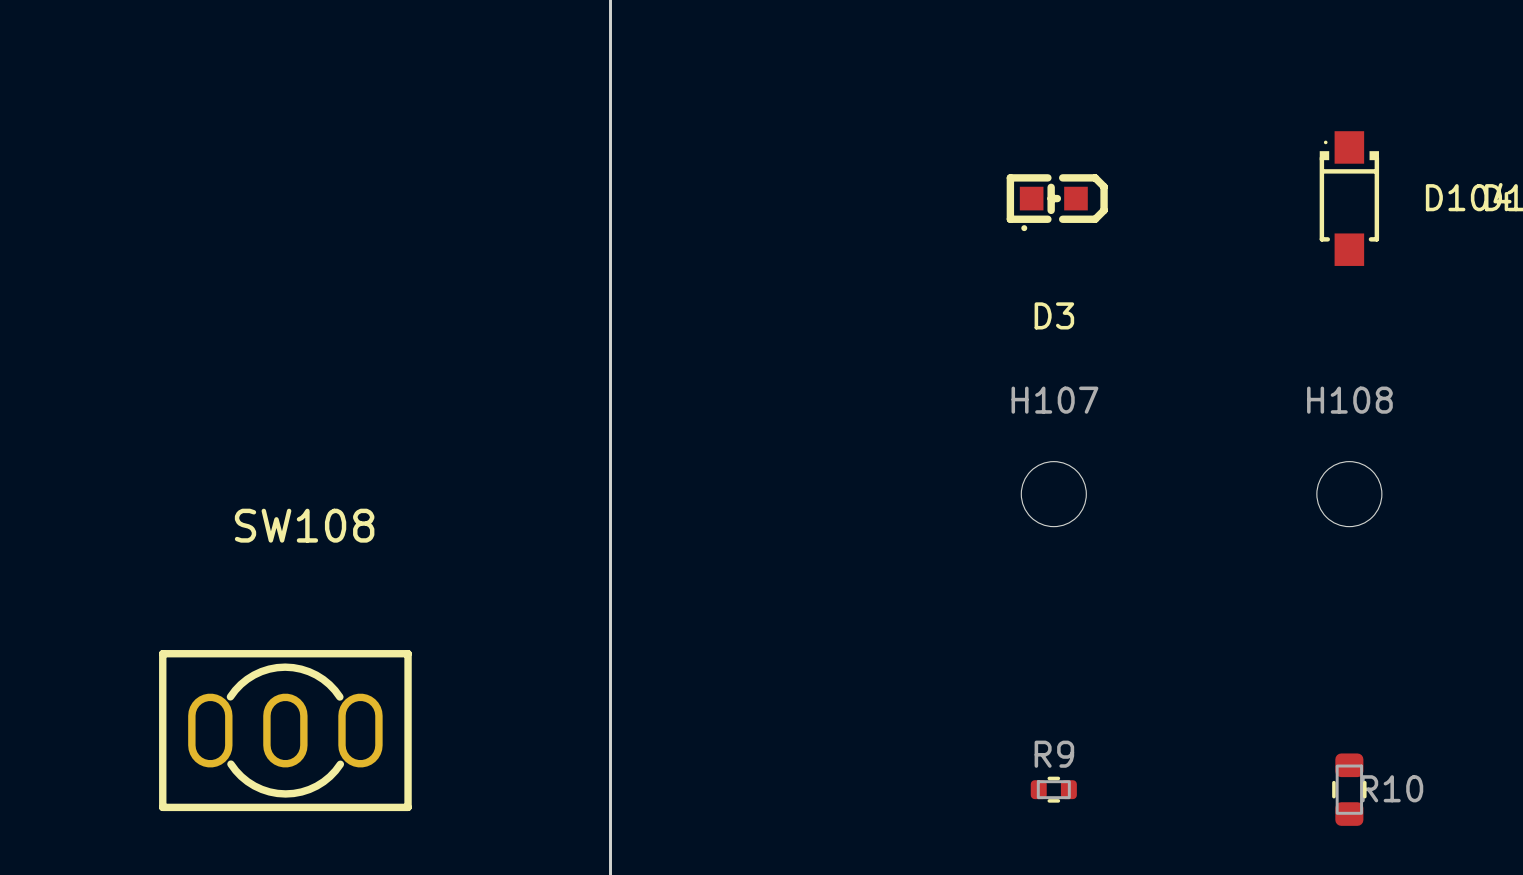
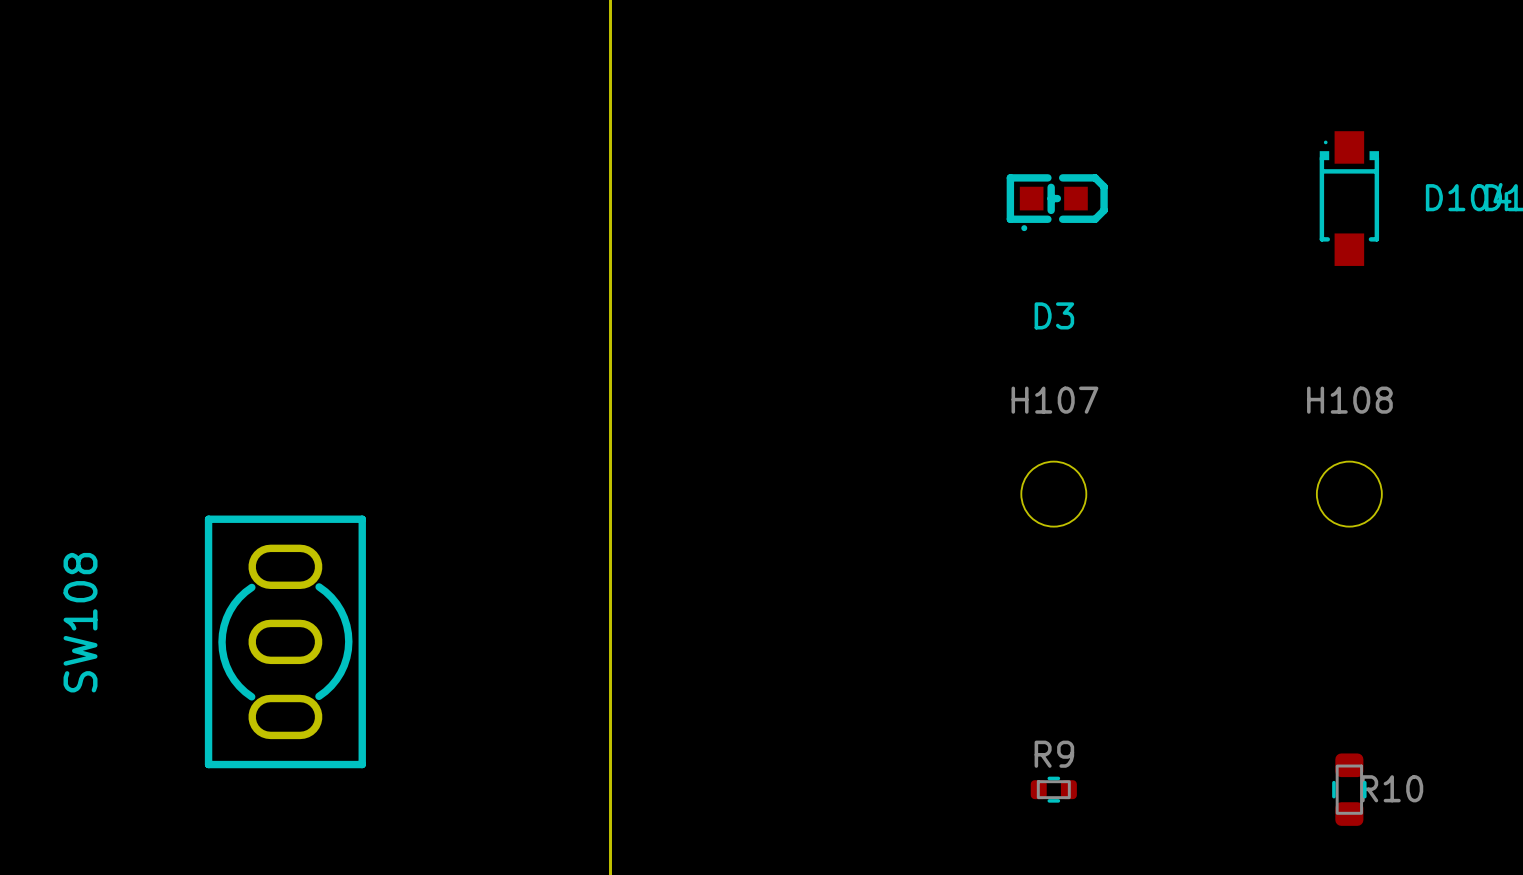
SW108 rotation: 0° (285, 730) -> 90° counterclockwise (285, 641)

